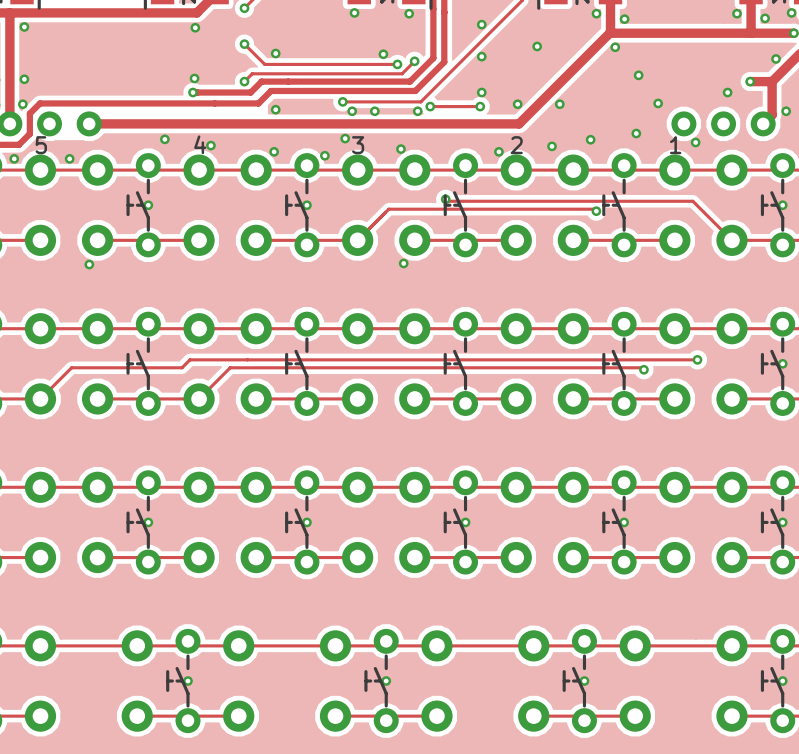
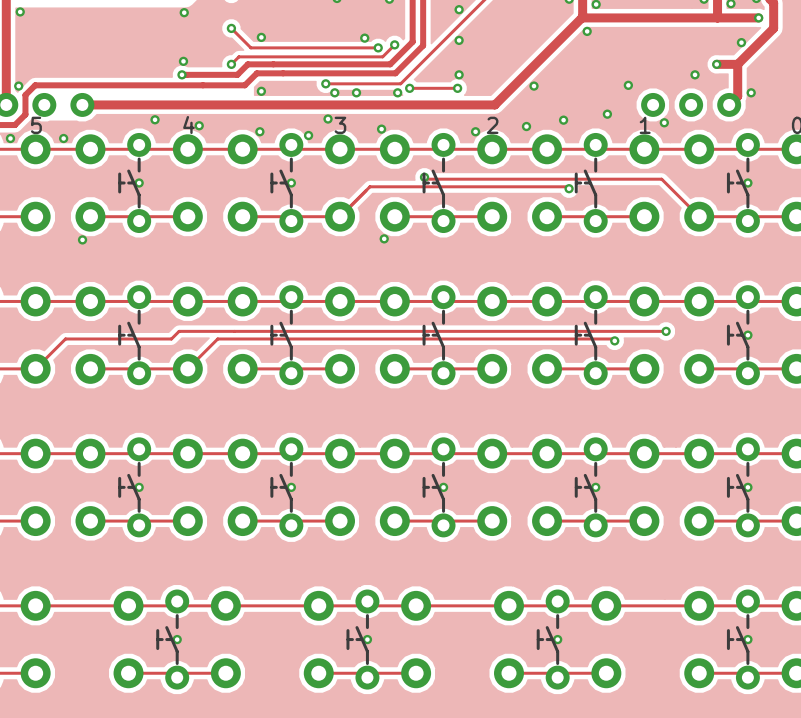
part: (537, 46) -> none
part: (638, 75) -> none
part: (24, 79) -> none
part: (517, 104) -> none

